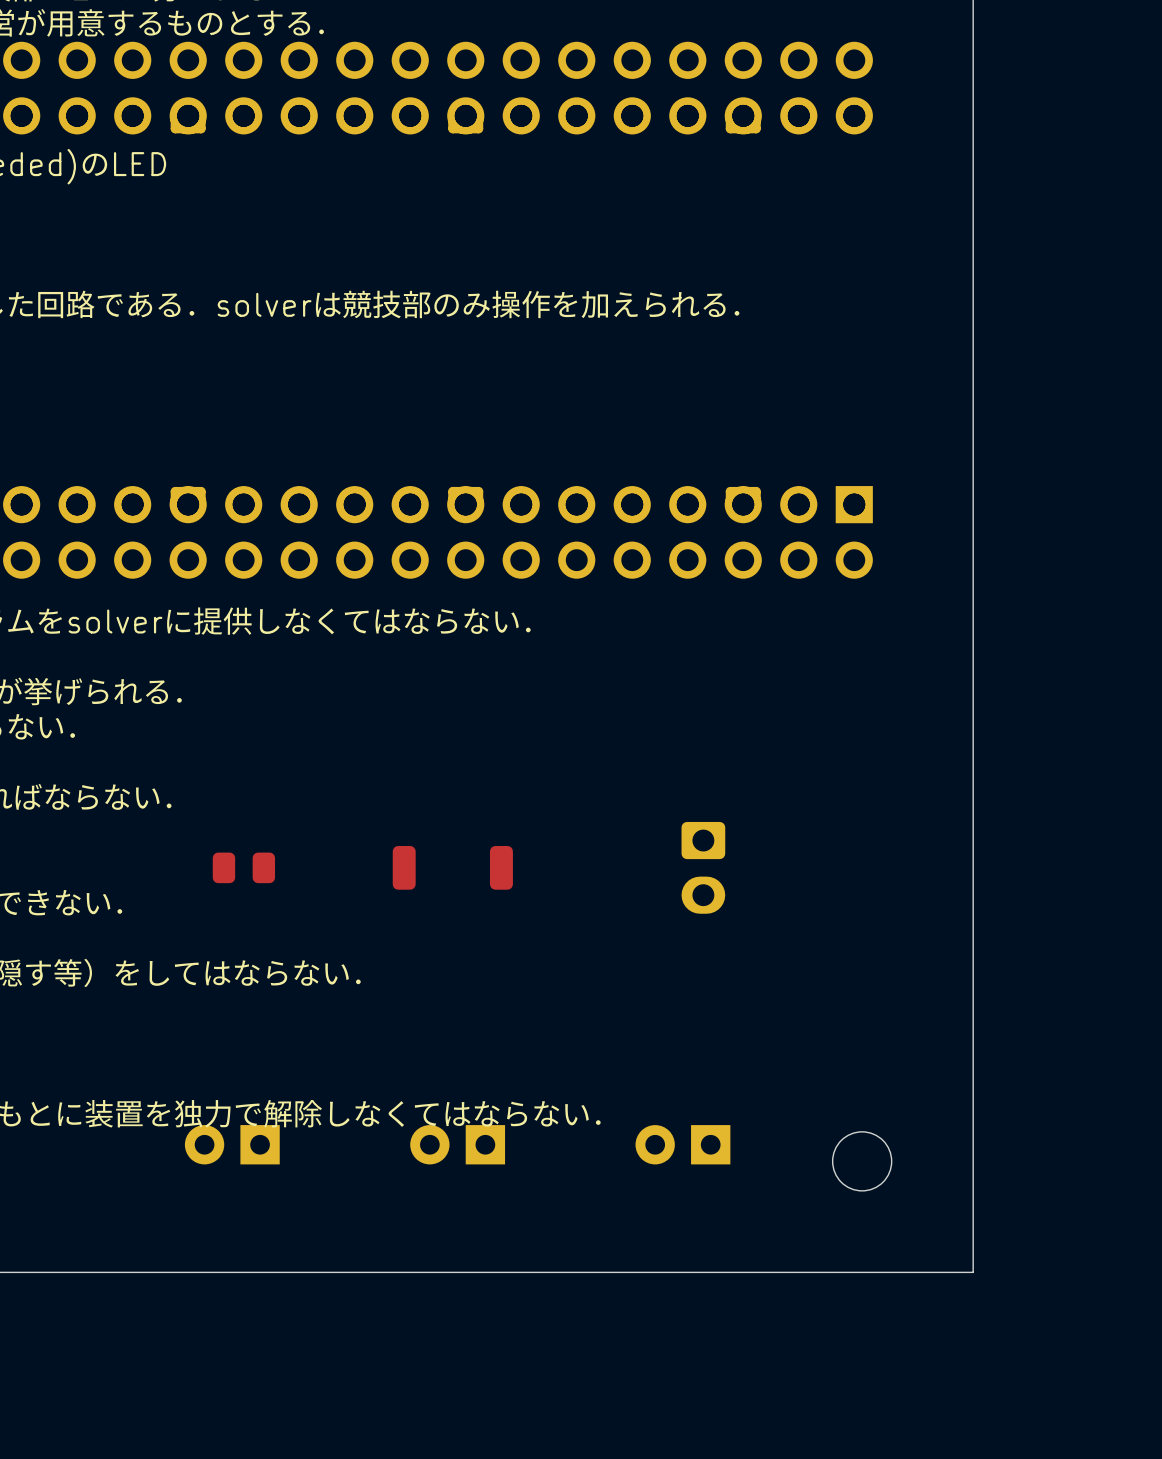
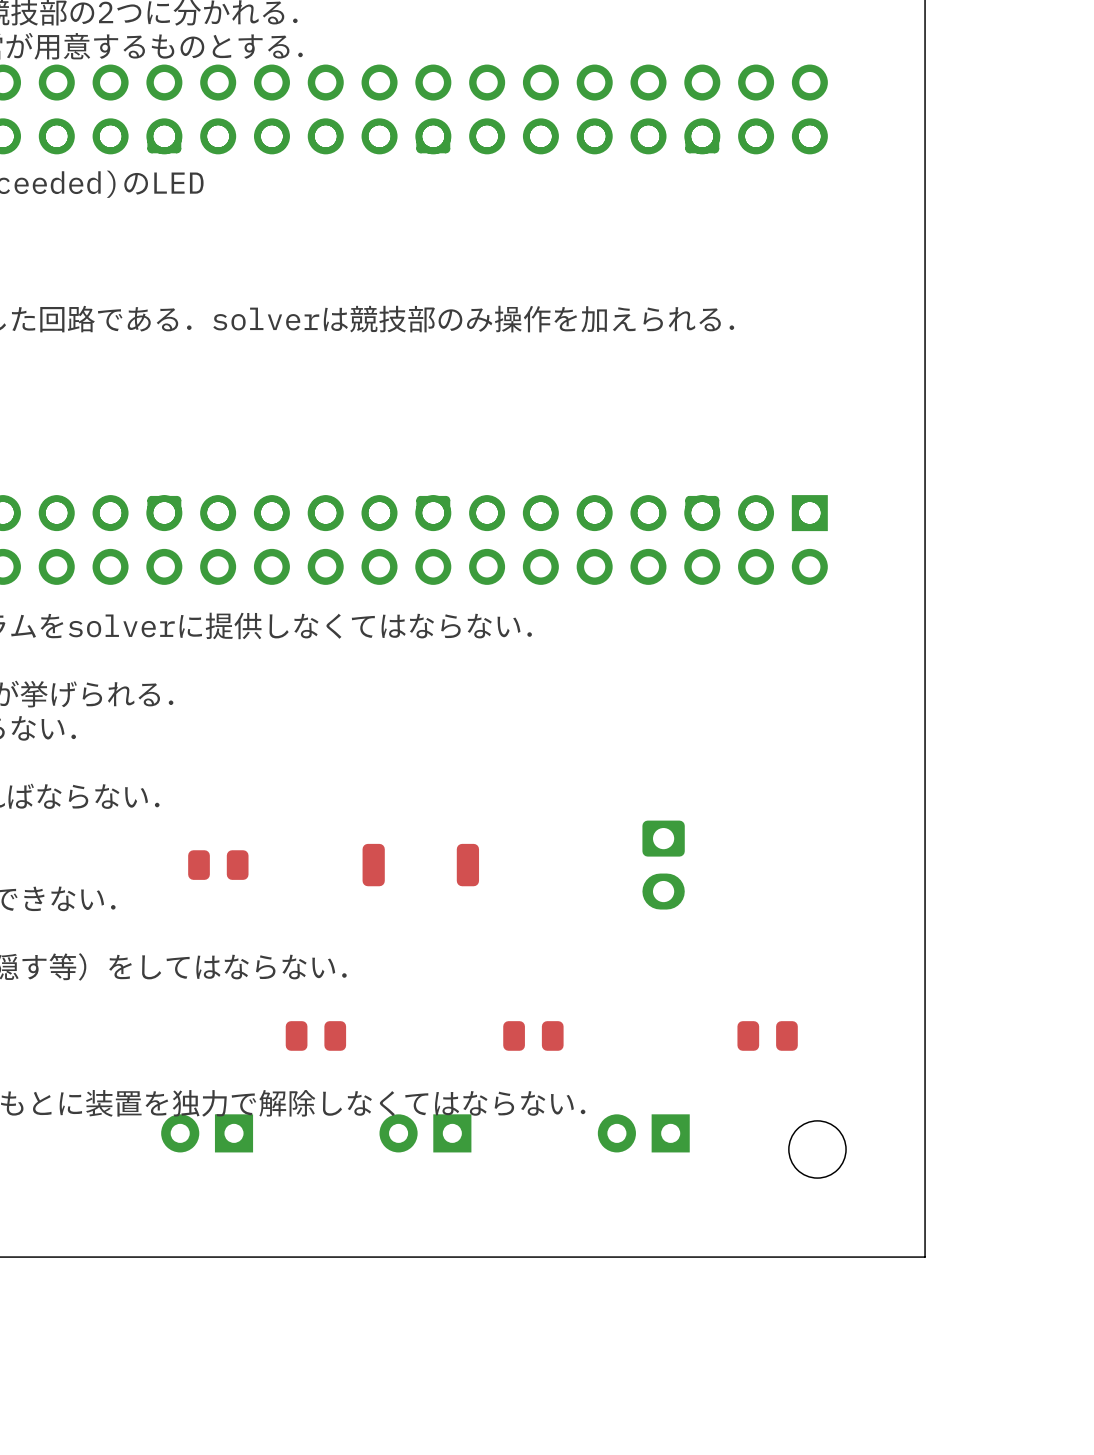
part: none -> (315, 1035)
part: none -> (533, 1035)
part: none -> (767, 1035)

